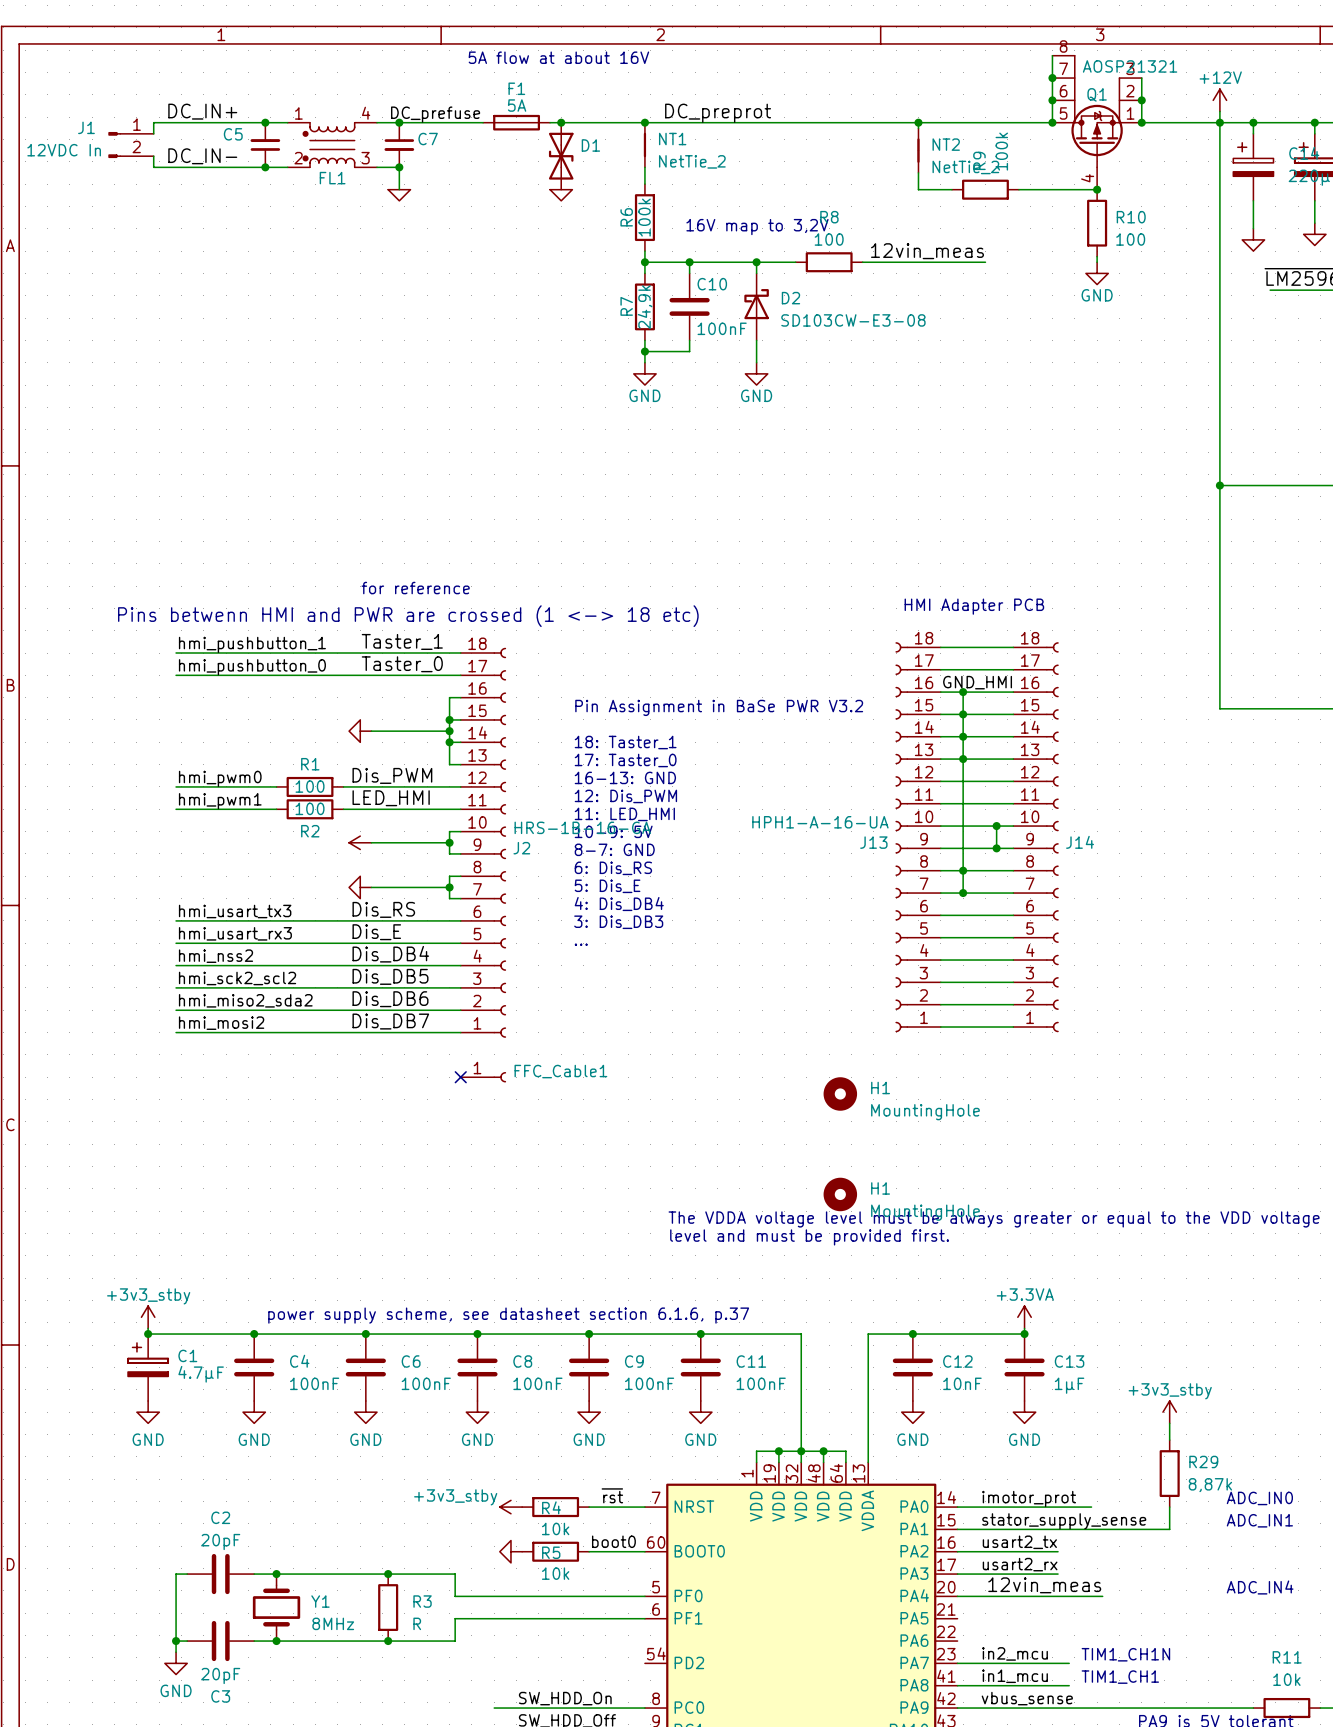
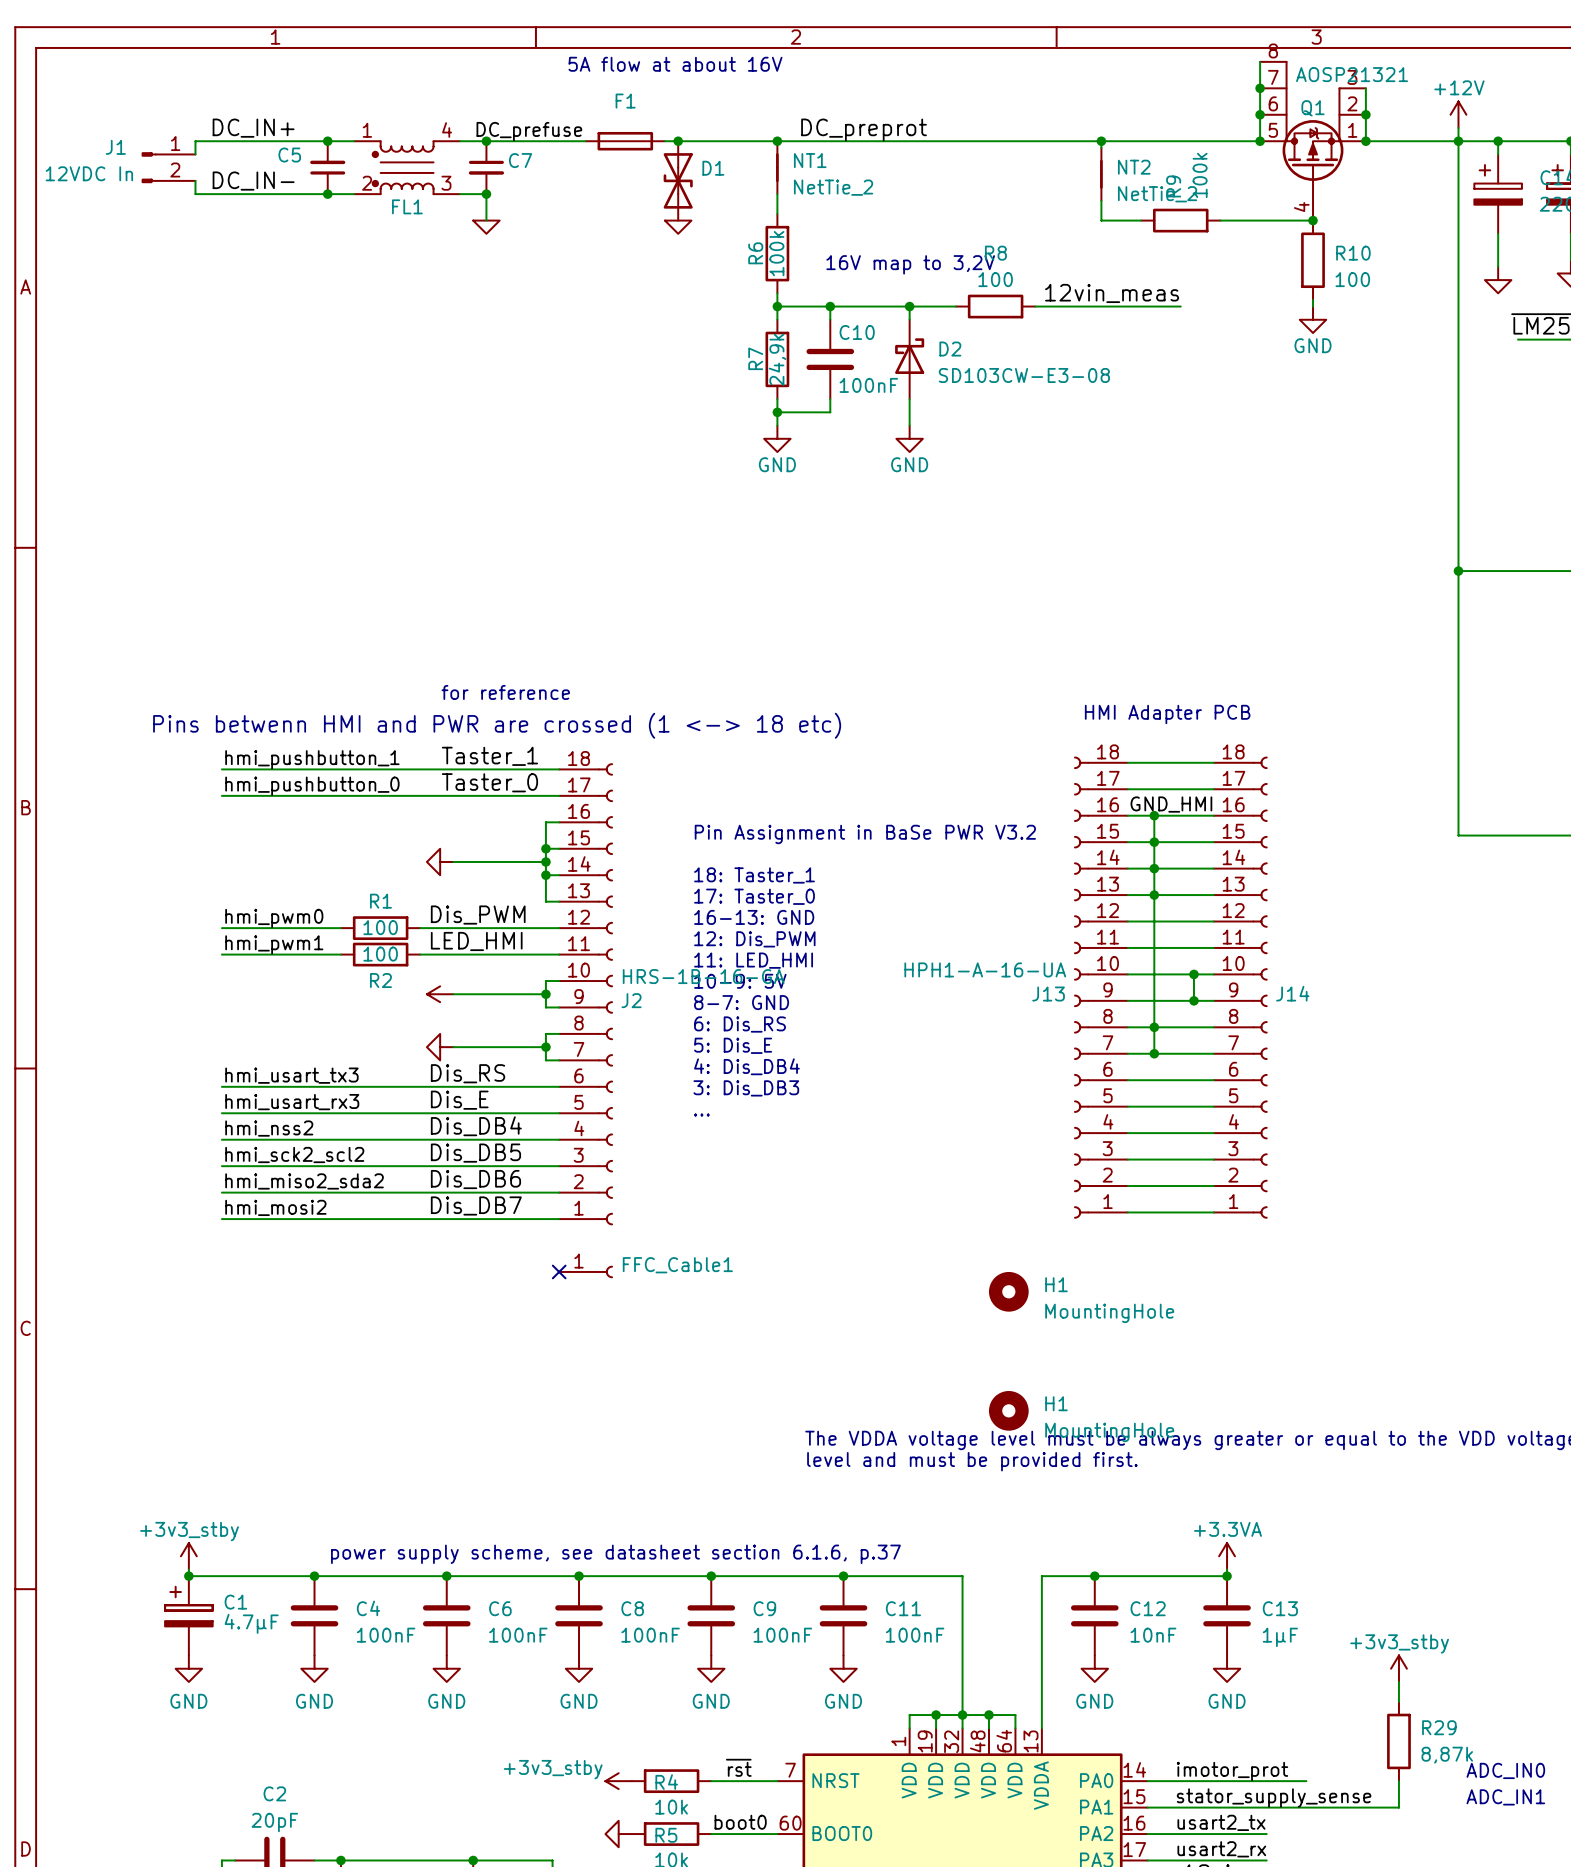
F1 text: 5A (517, 105) -> none

